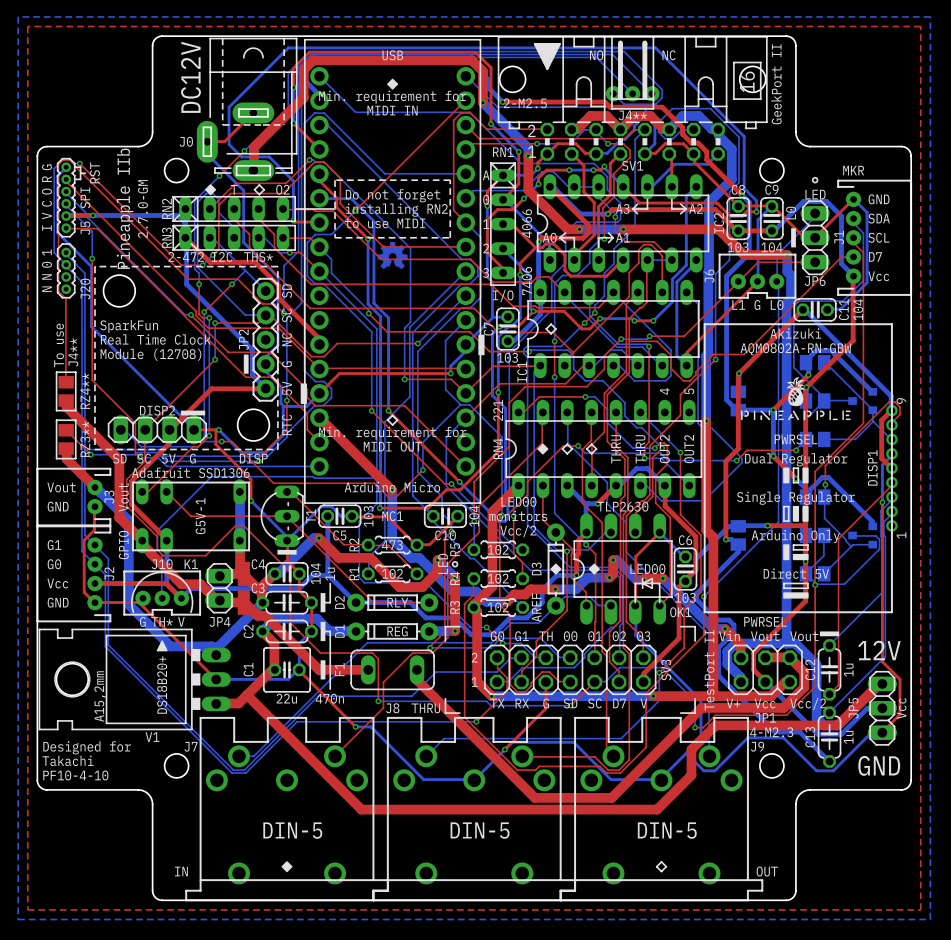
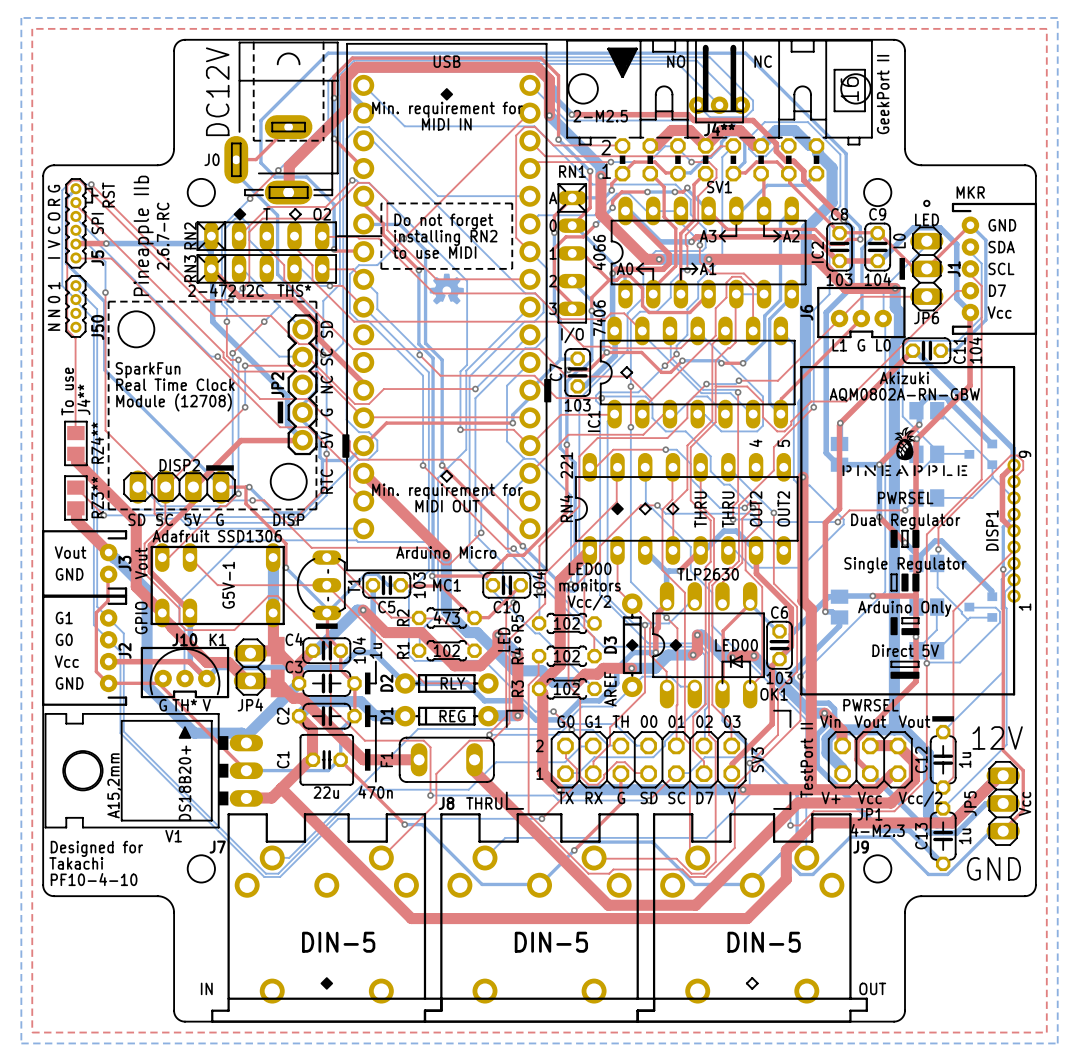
text: 2.7.0-GM (142, 209) -> 2.6.7-RC (163, 236)
J20 name: J20 (85, 289) -> J50 (97, 327)

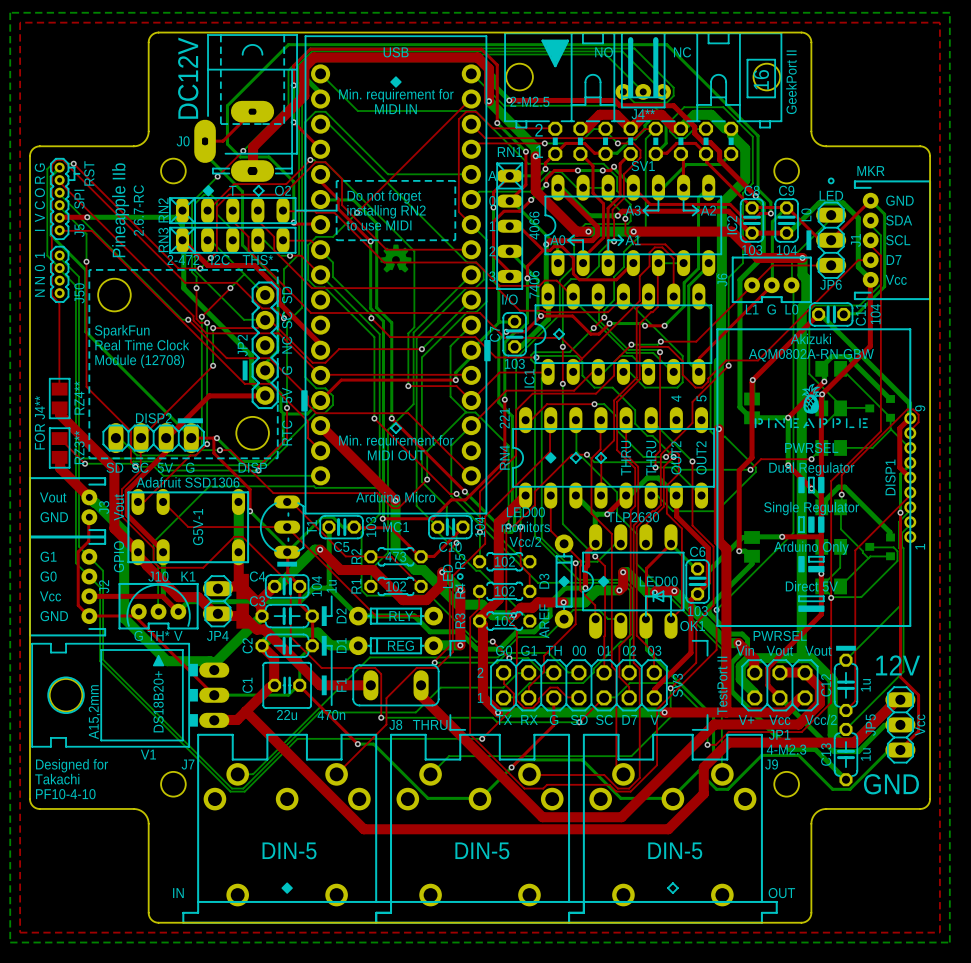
text: To use (67, 391) -> none
text: J4** (83, 399) -> none
text: none -> FOR J4** (39, 422)

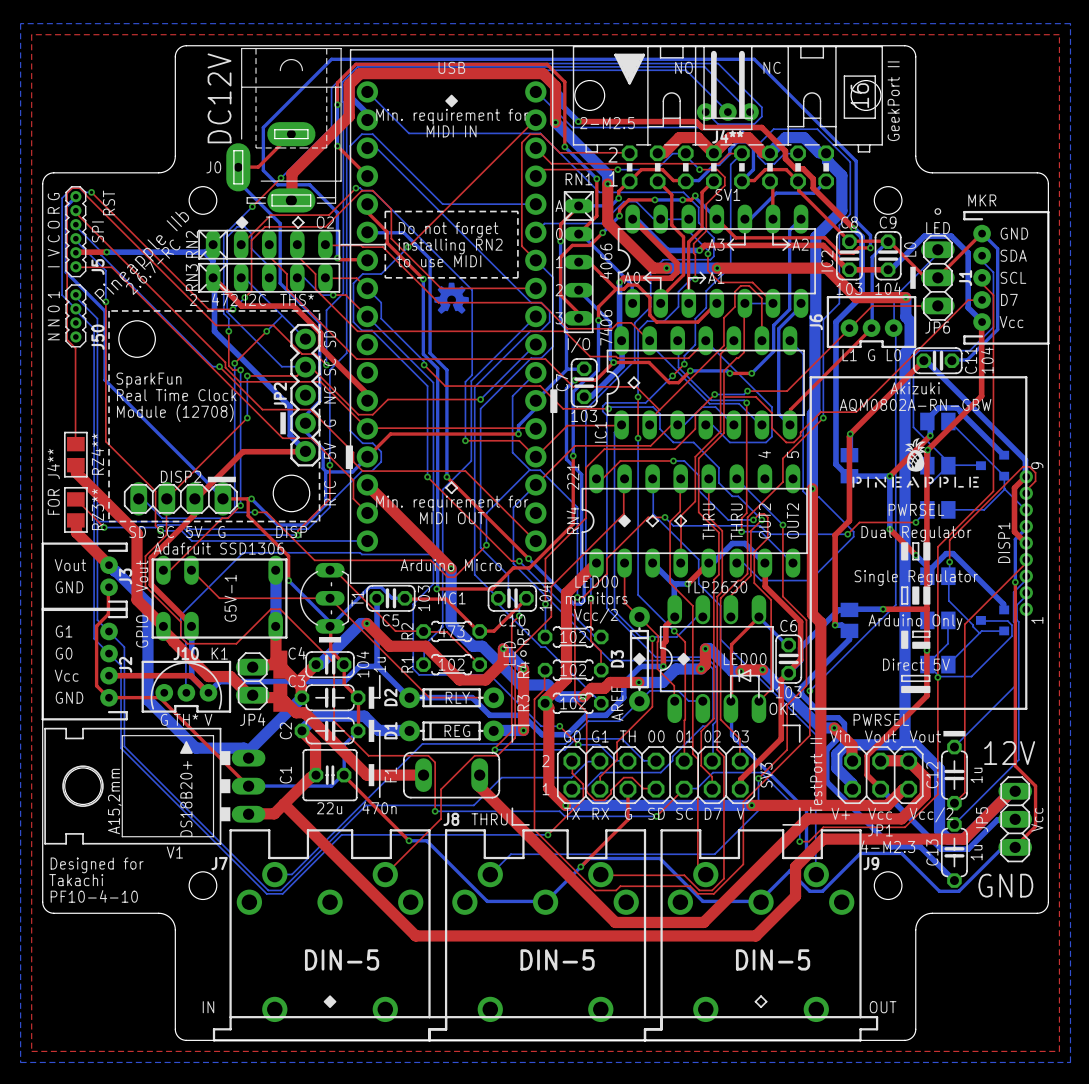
line: (69, 167) (74, 167) (74, 180) (69, 180) -> none
line: (74, 173) (79, 173) -> none
text rotation: 0° (120, 210) -> 45° clockwise (141, 257)
text rotation: 0° (138, 210) -> 45° clockwise (153, 267)

